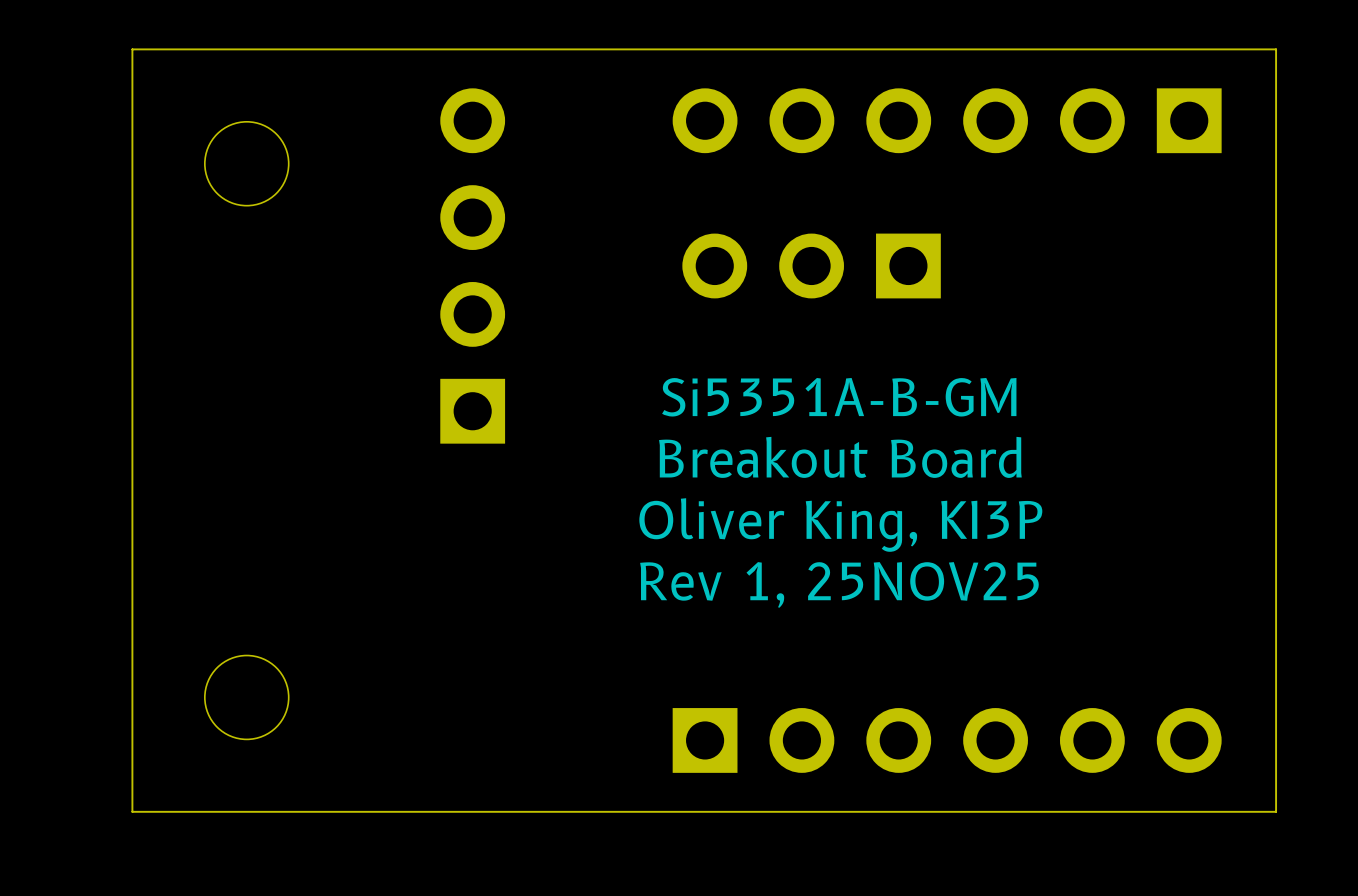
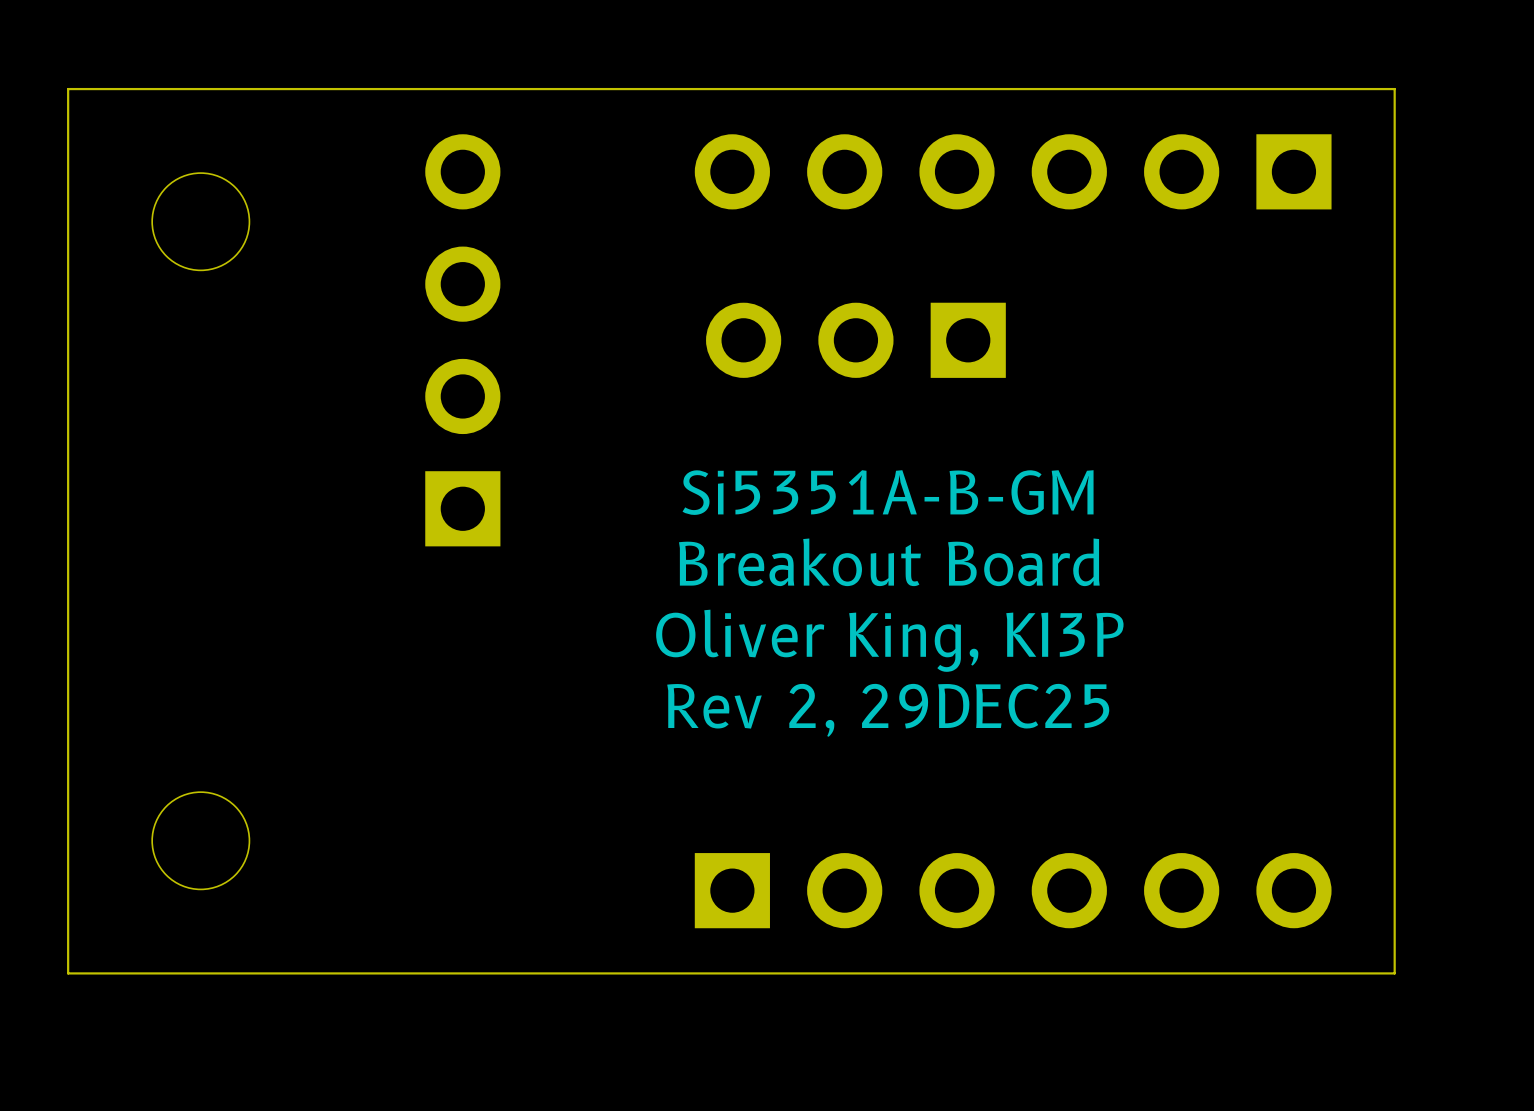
text: Rev 1, 25NOV25 (839, 584) -> Rev 2, 29DEC25 (888, 710)

